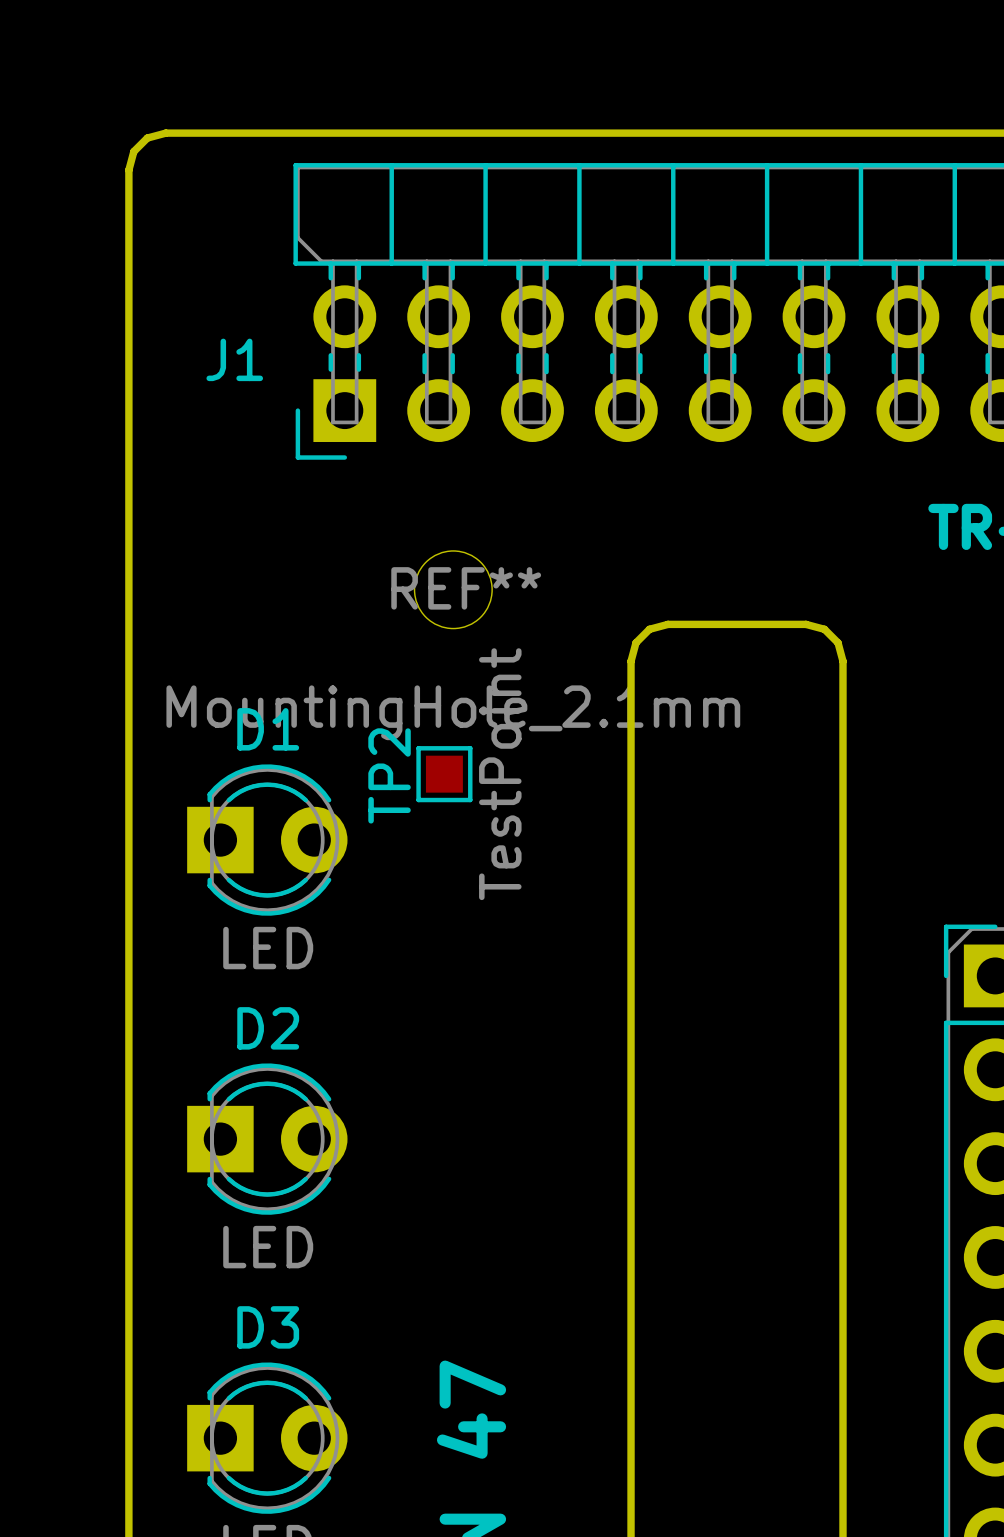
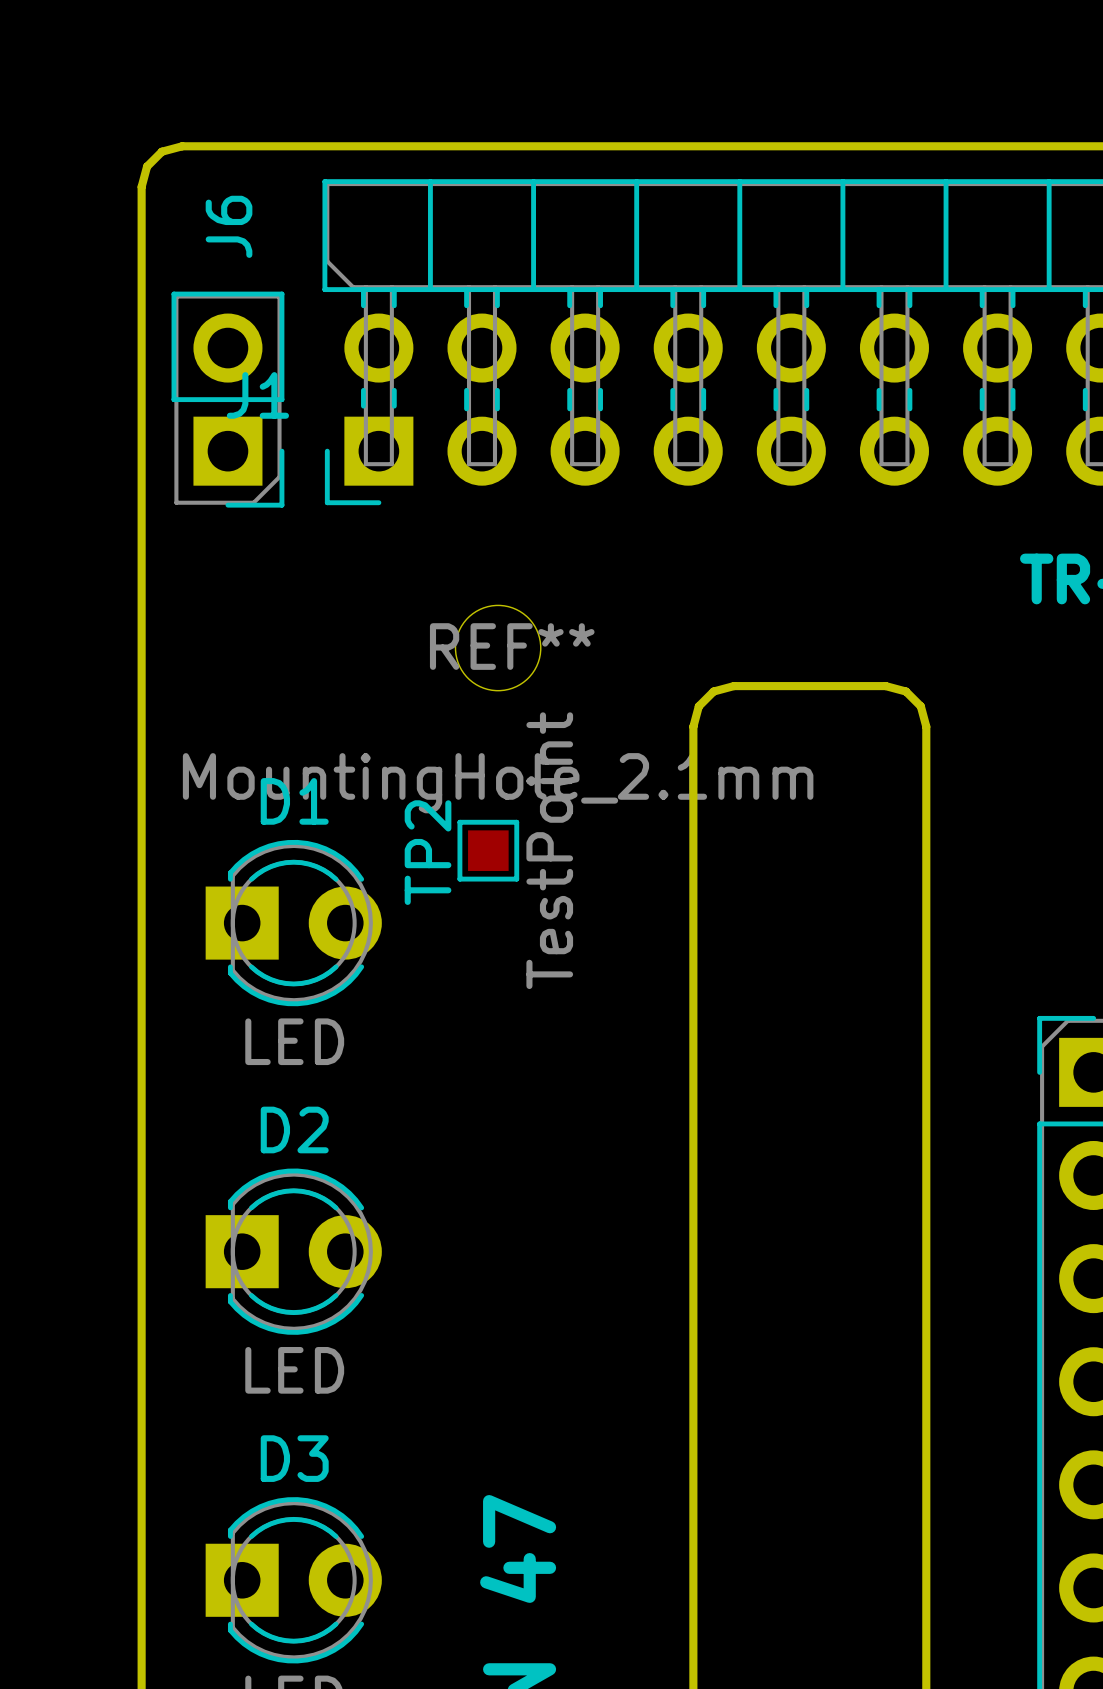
J6: none -> (227, 399)

